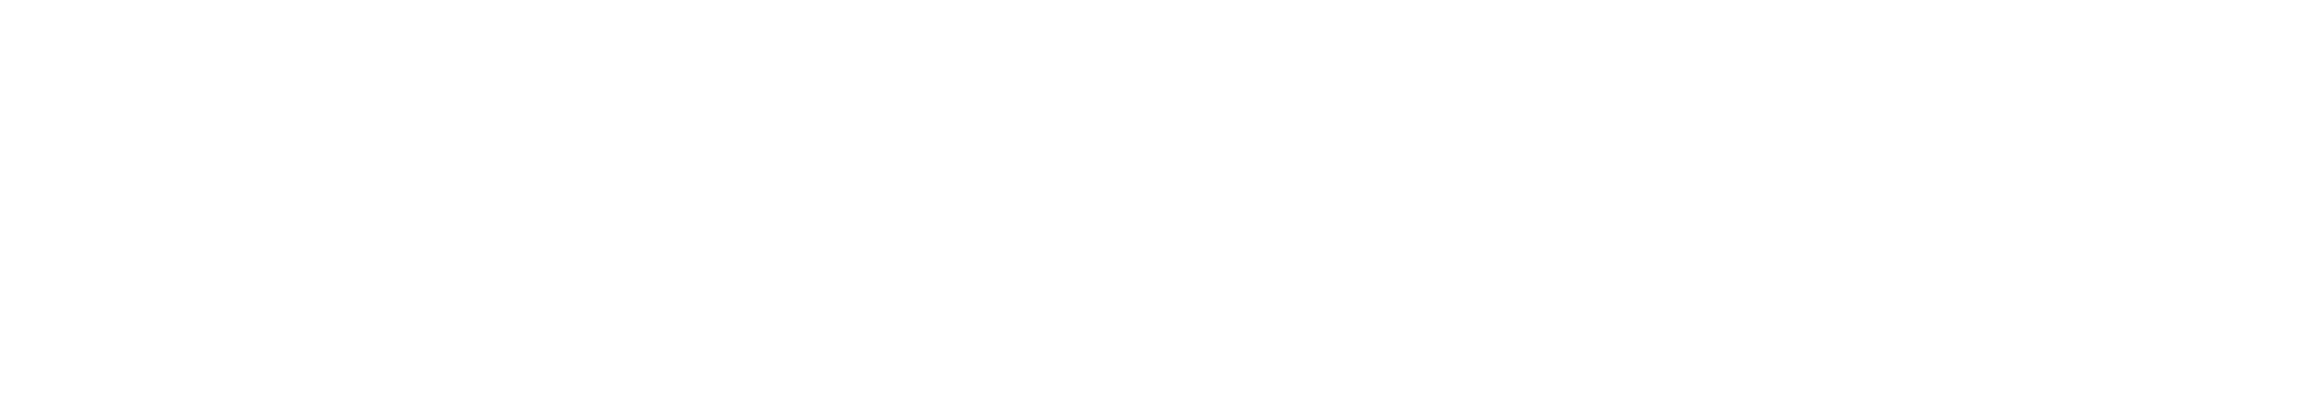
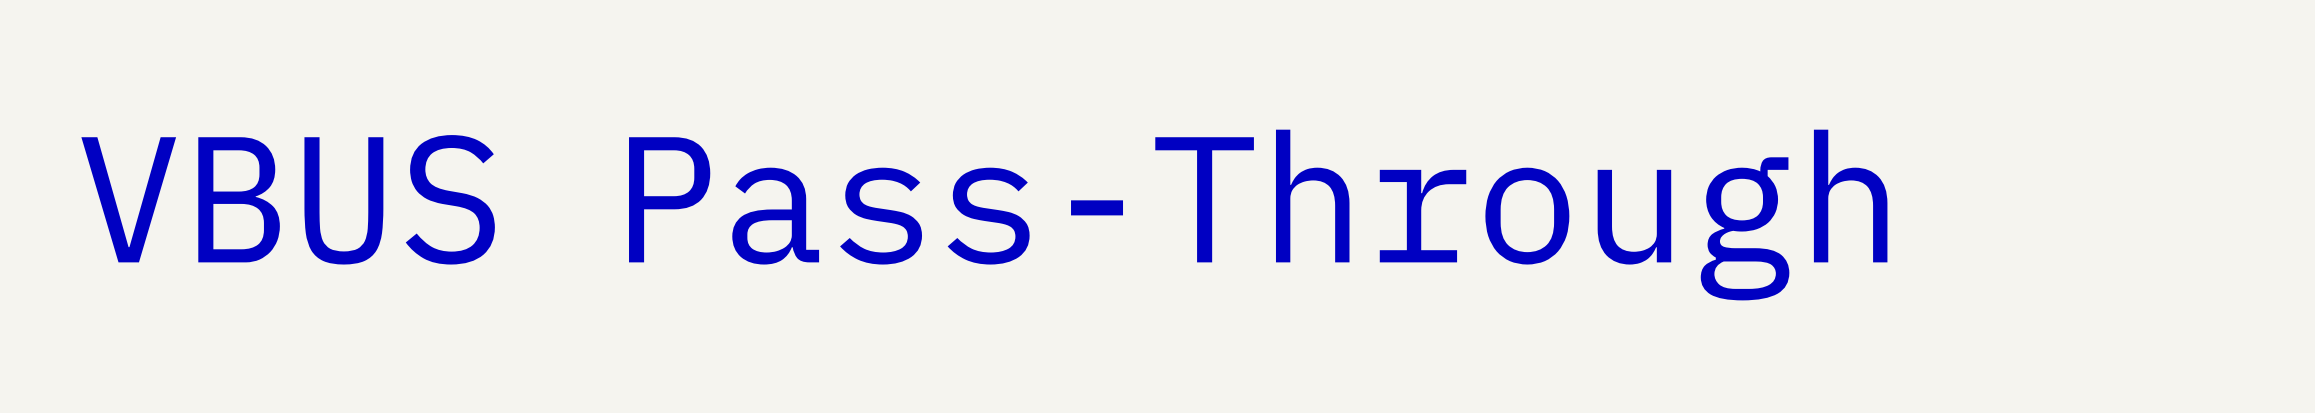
text: none -> VBUS Pass-Through (984, 215)

